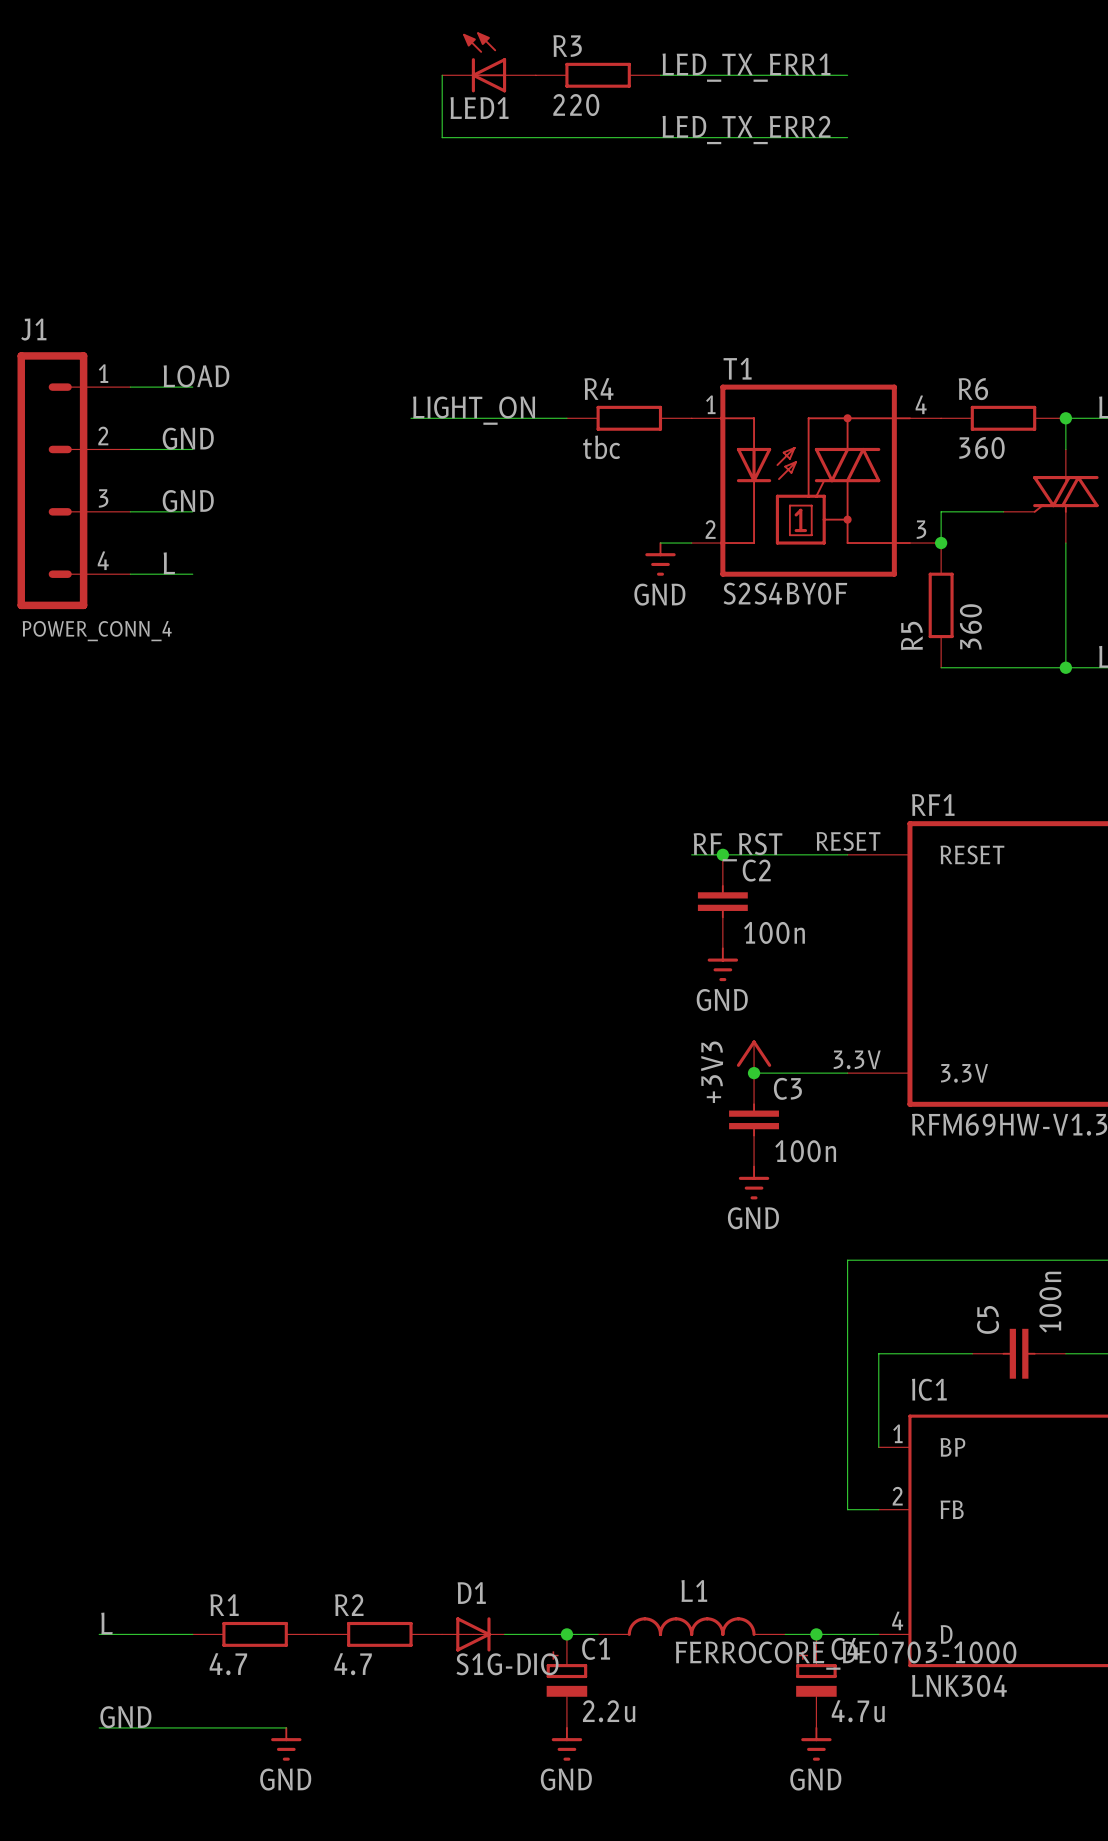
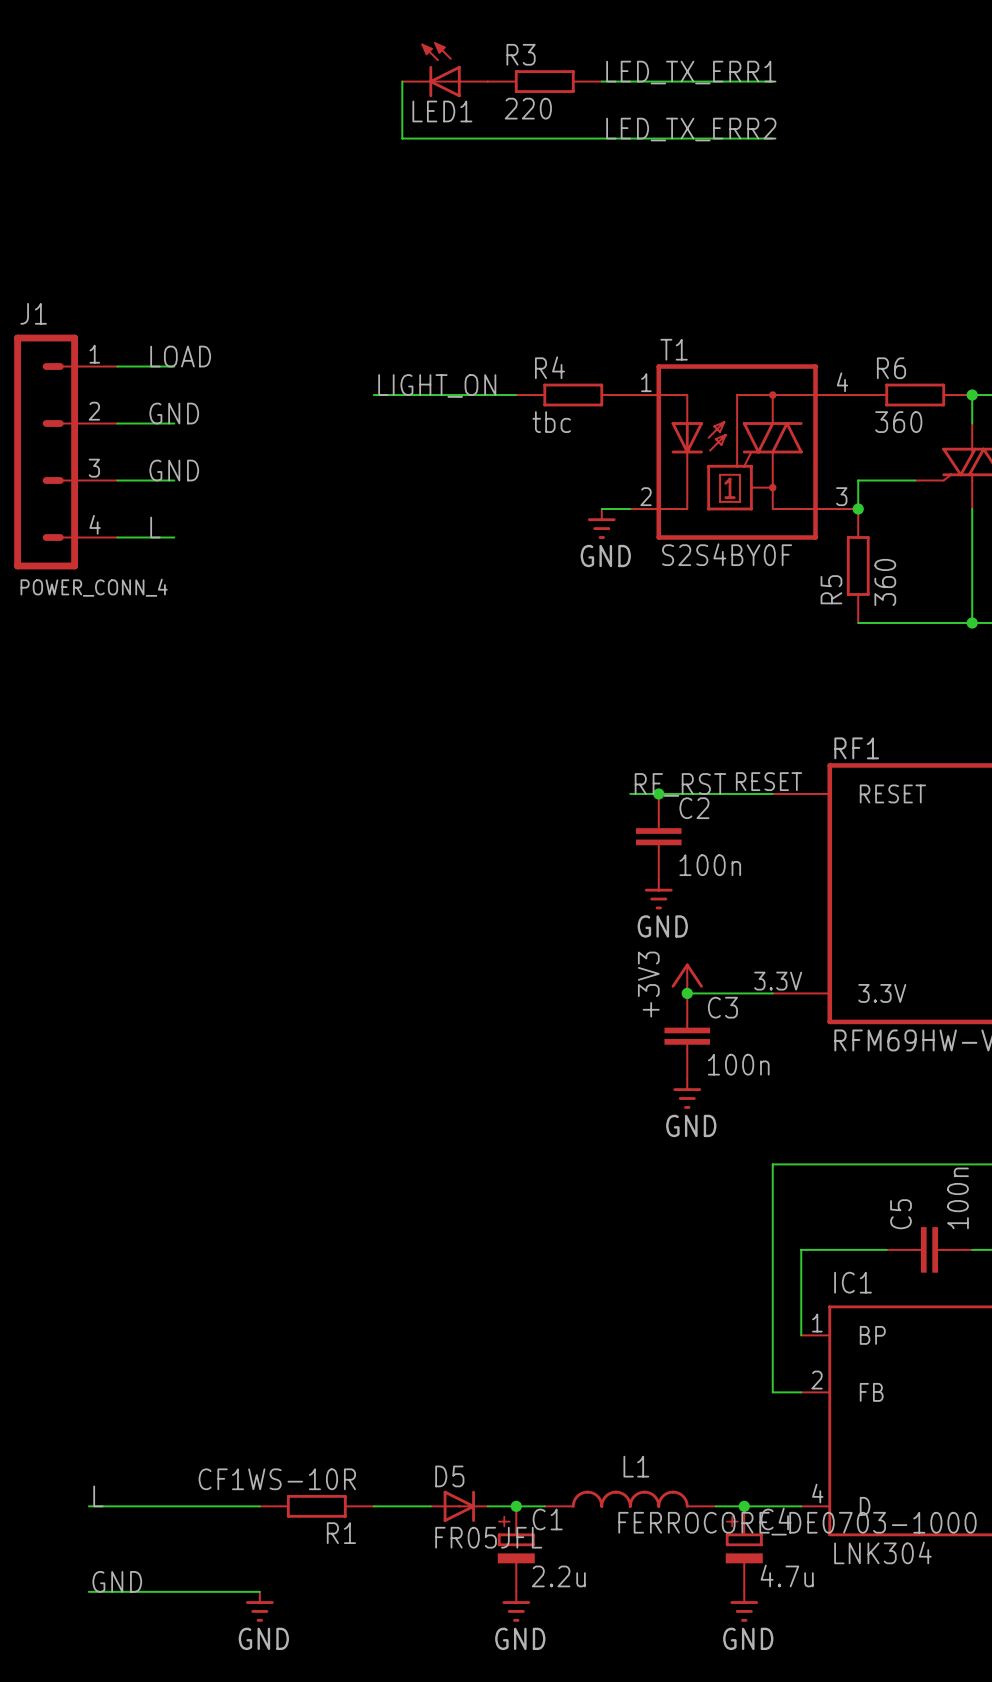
R1 name position: R1 (224, 1605) -> R1 (341, 1533)
wire: none -> (174, 1506) (259, 1506)
R1 position: (255, 1634) -> (316, 1506)
R2: 4.7 (379, 1634) -> none
D1: S1G-DIO (473, 1634) -> none
D5: none -> FR05JFL (459, 1506)
R1 value: 4.7 (228, 1664) -> CF1WS-10R (277, 1479)

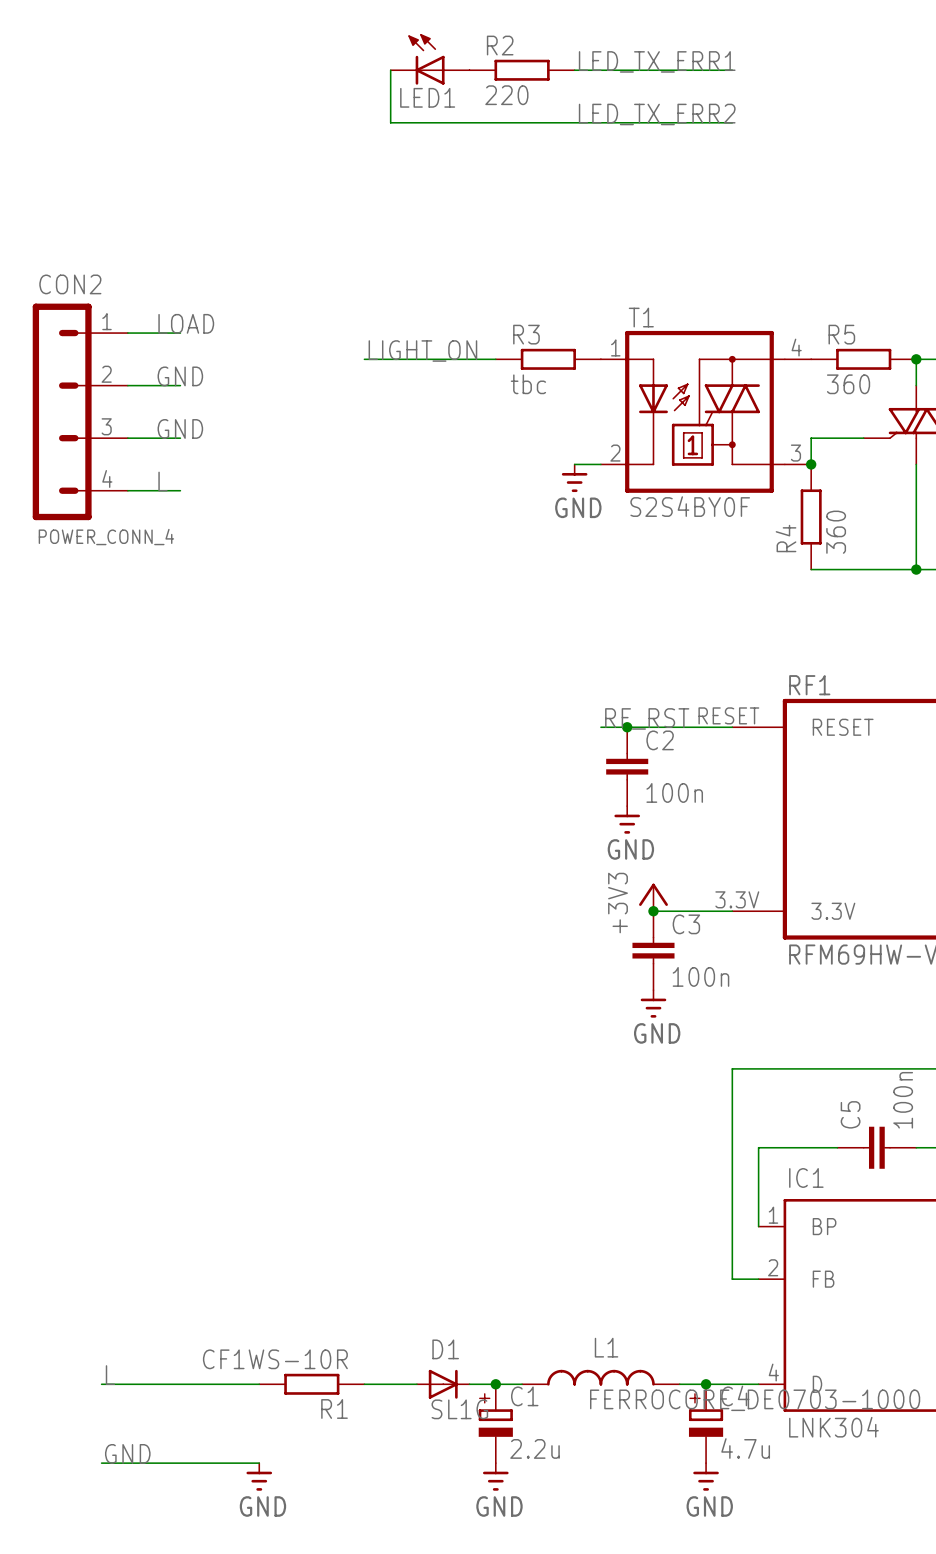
R3 name: R3 (521, 54) -> R2 (500, 45)
J1 name: J1 (33, 313) -> CON2 (70, 284)
R4 name: R4 (549, 367) -> R3 (526, 334)
R6 name: R6 (891, 368) -> R5 (841, 334)
R5 name: R5 (831, 589) -> R4 (786, 538)
D5 name: D5 (449, 1476) -> D1 (445, 1349)
D5 value: FR05JFL (488, 1537) -> SL1G (459, 1409)

